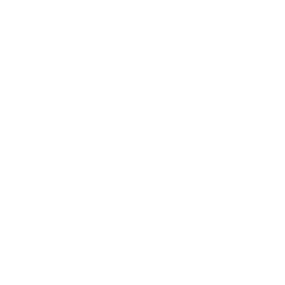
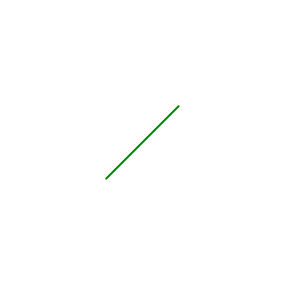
wire: none -> (178, 106) (106, 178)

